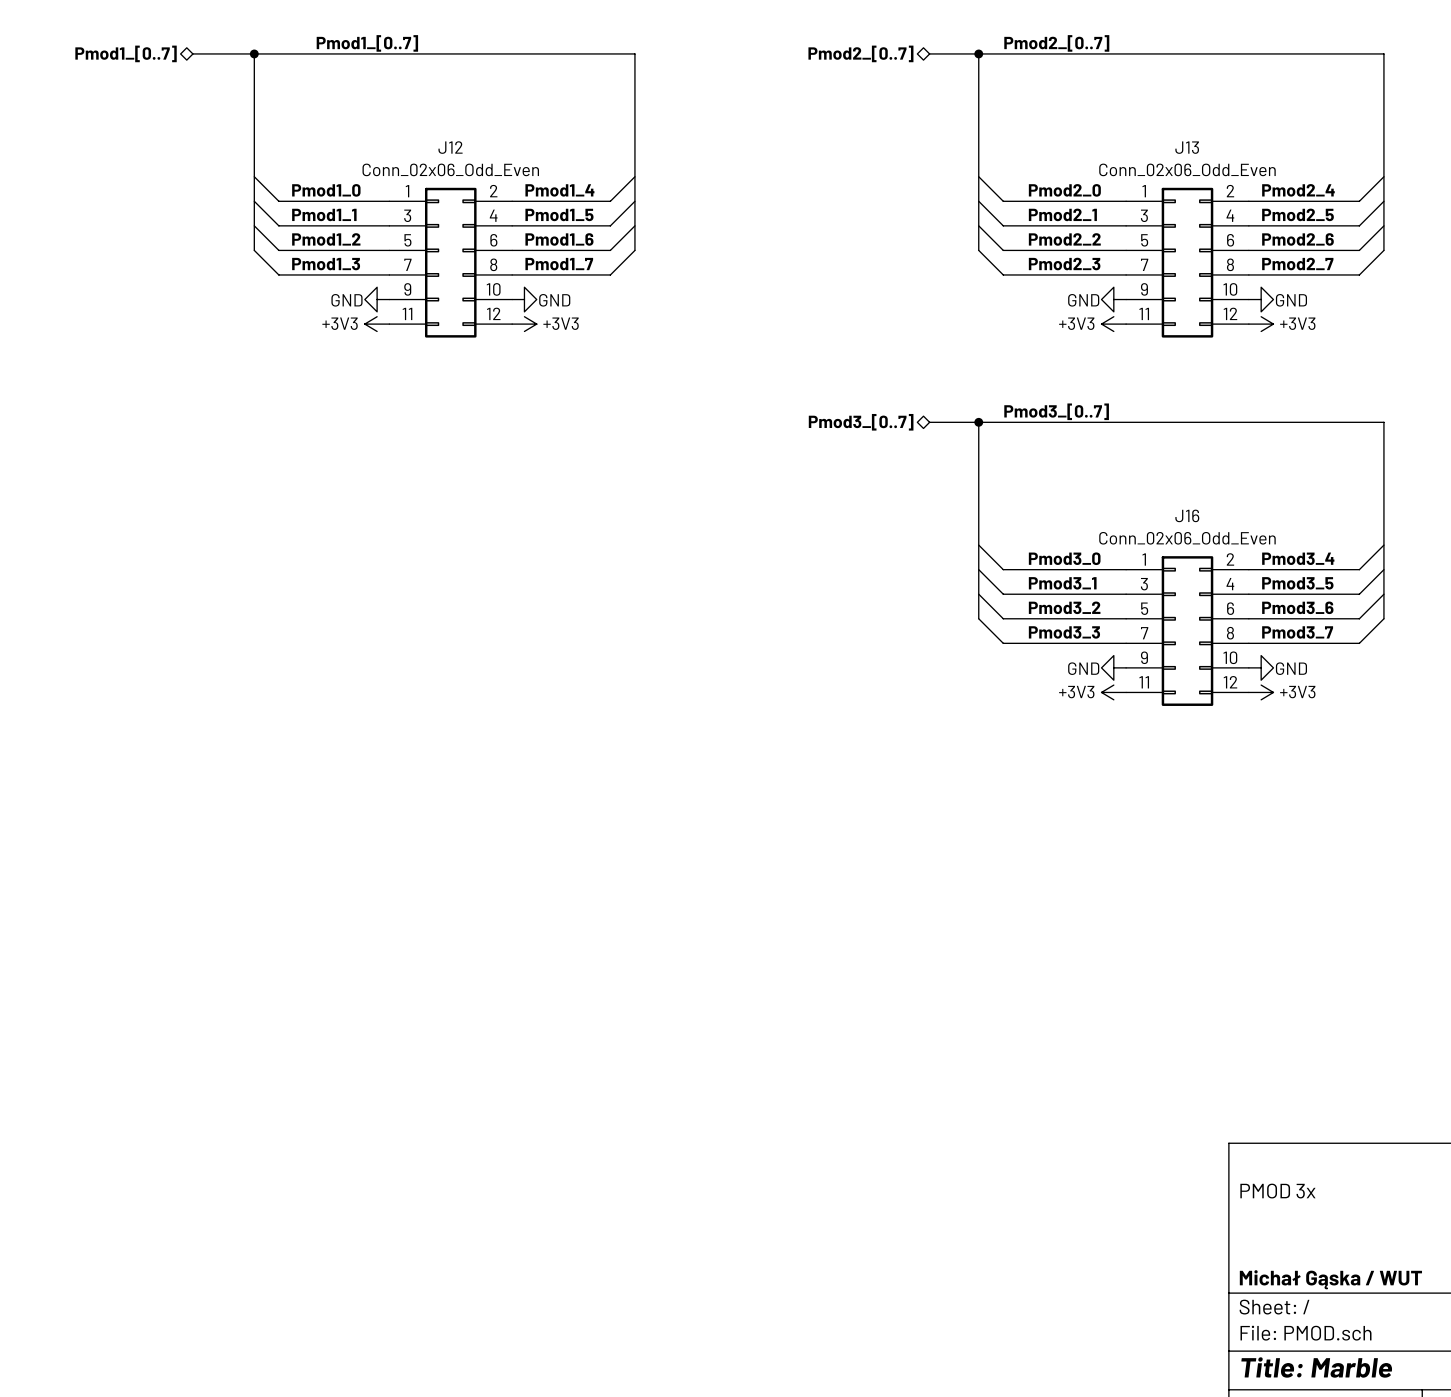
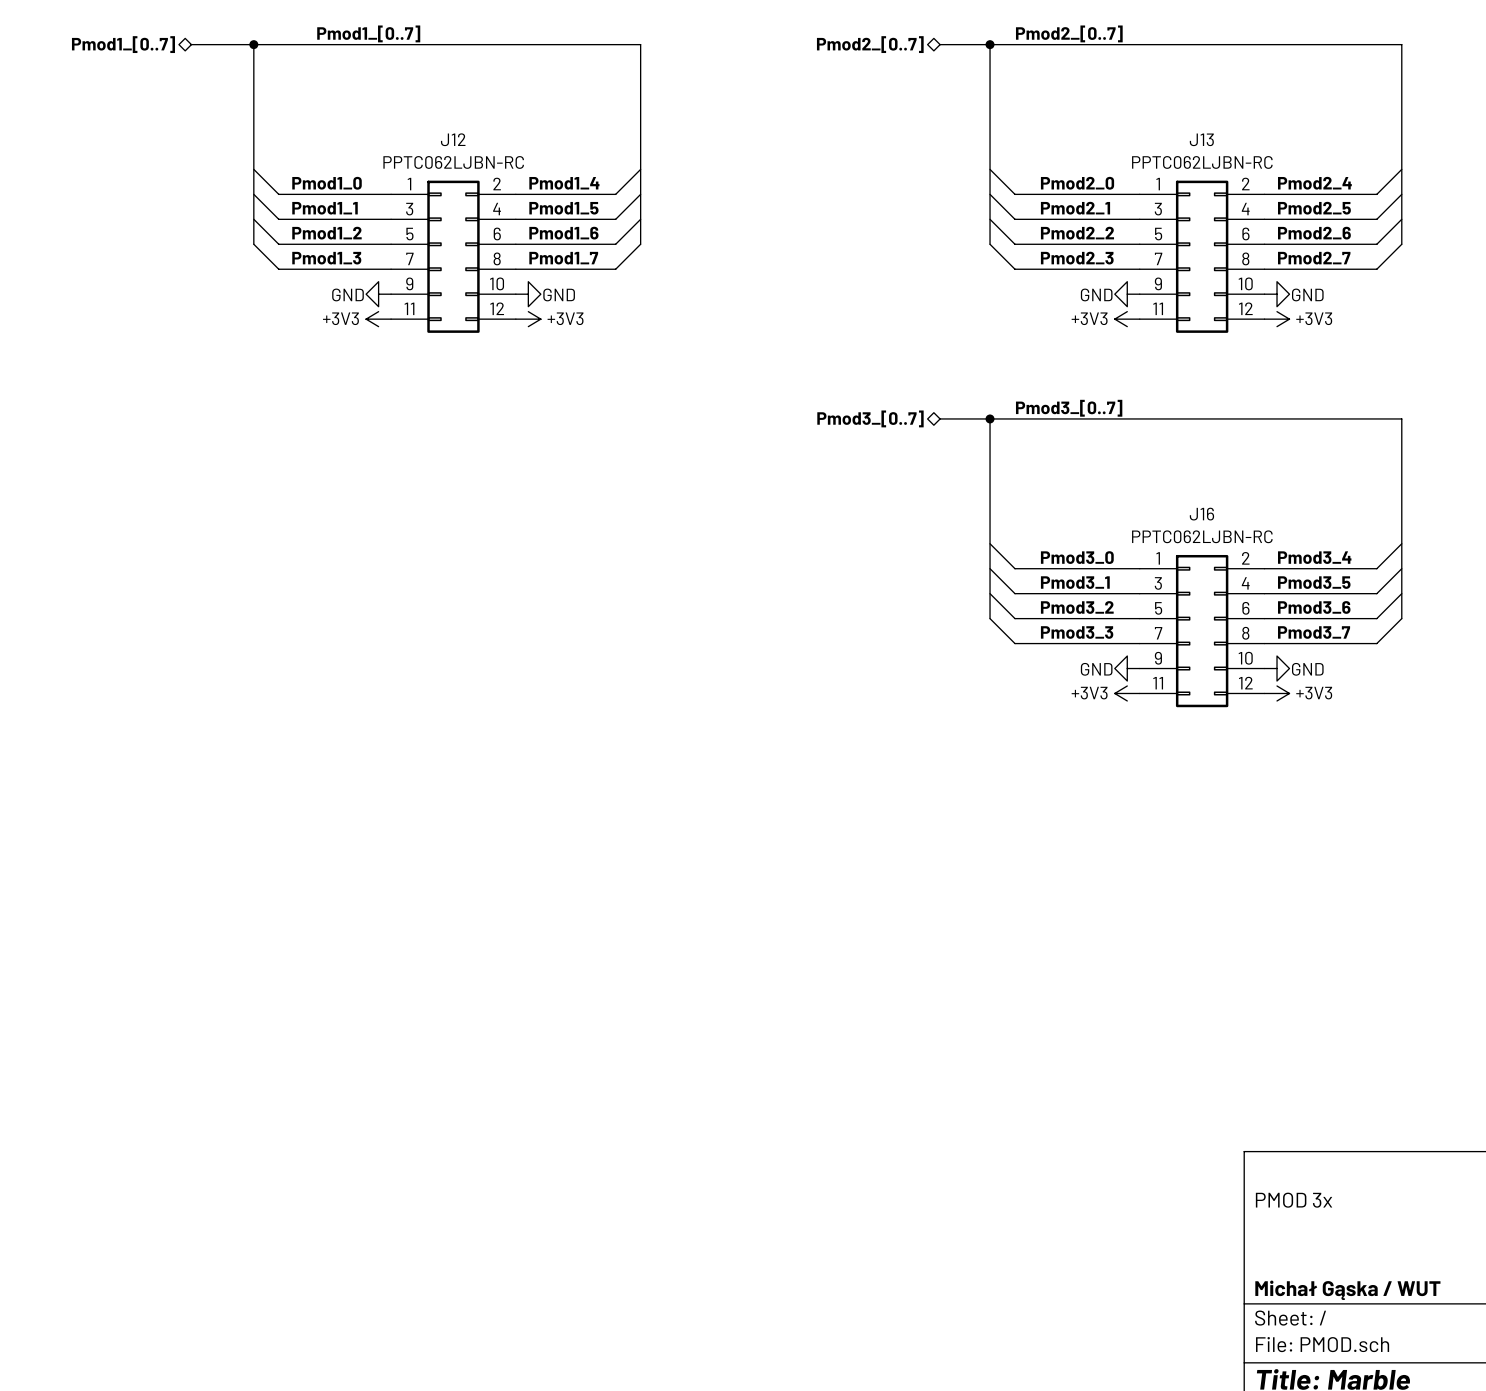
J12 value: Conn_02x06_Odd_Even (450, 169) -> PPTC062LJBN-RC (453, 162)
J13 value: Conn_02x06_Odd_Even (1187, 169) -> PPTC062LJBN-RC (1202, 162)
J16 value: Conn_02x06_Odd_Even (1187, 538) -> PPTC062LJBN-RC (1202, 536)

